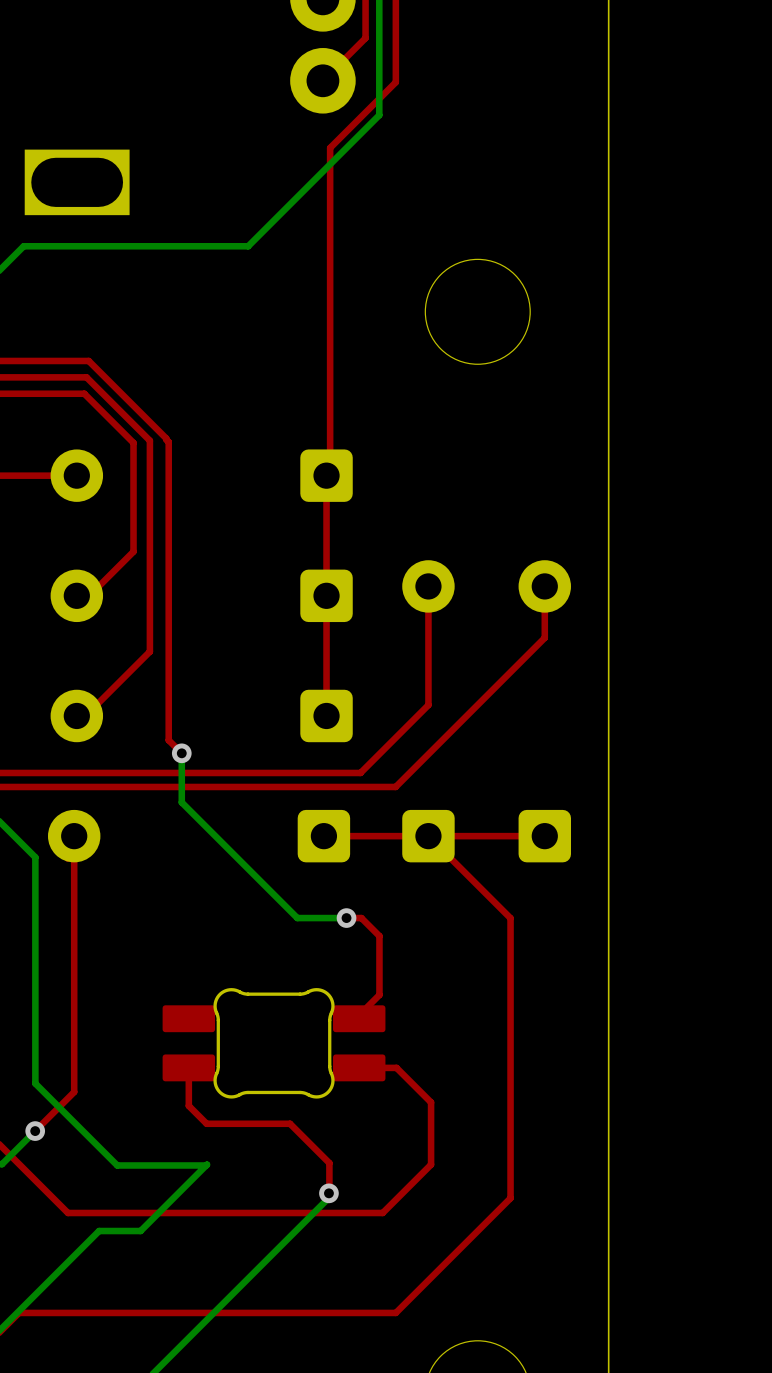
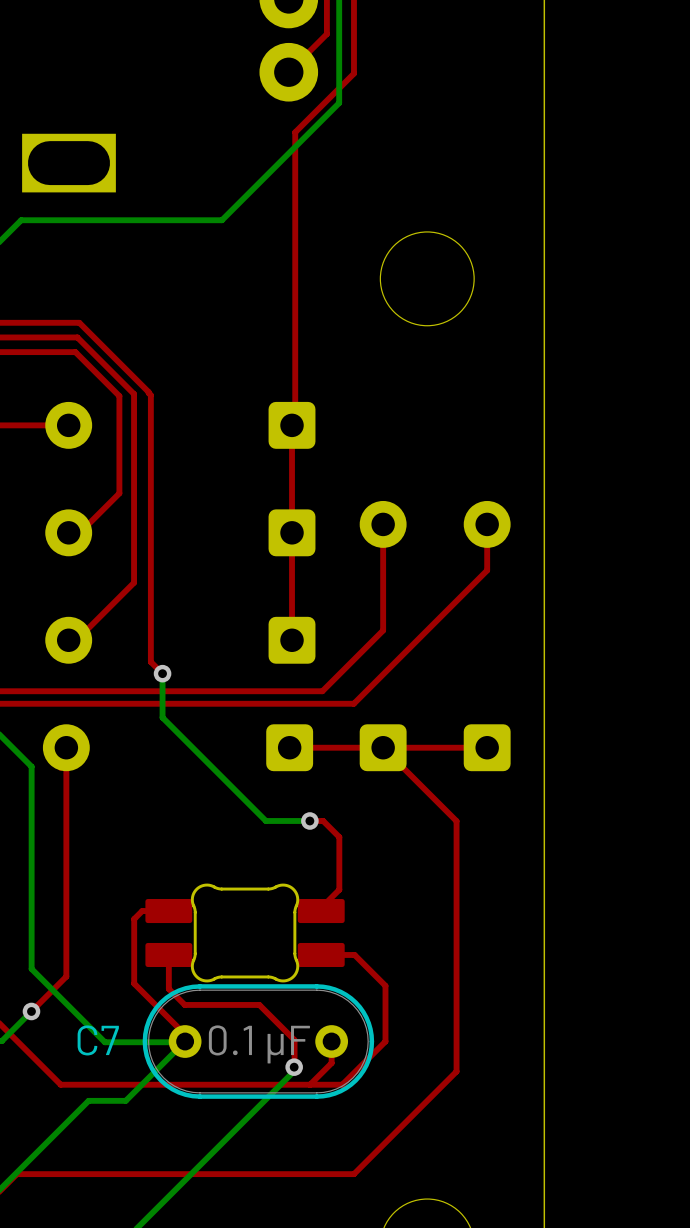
top track: none -> (168, 911) (142, 911) (134, 919) (134, 983) (192, 1041)
C7: none -> 0.1 μF (258, 1041)
top track: none -> (331, 1041) (331, 1063) (310, 1084)

